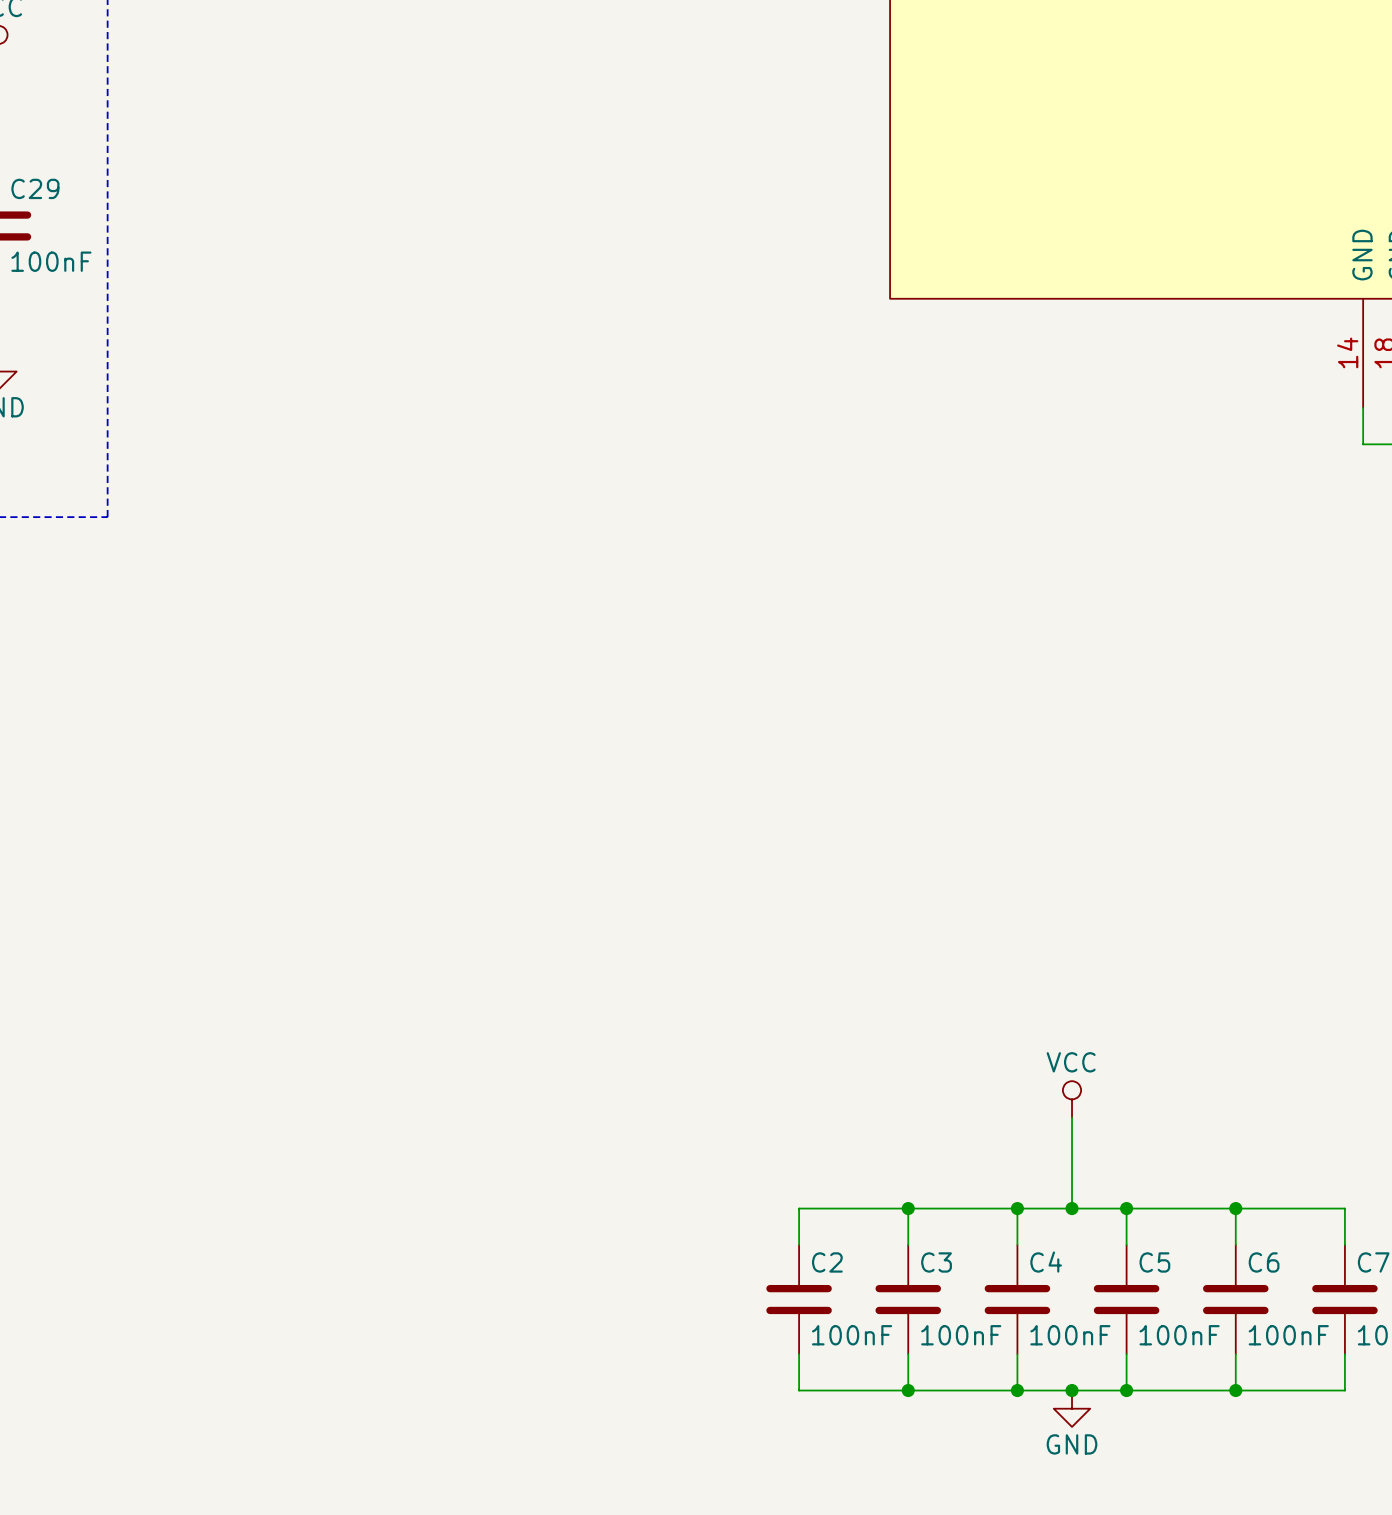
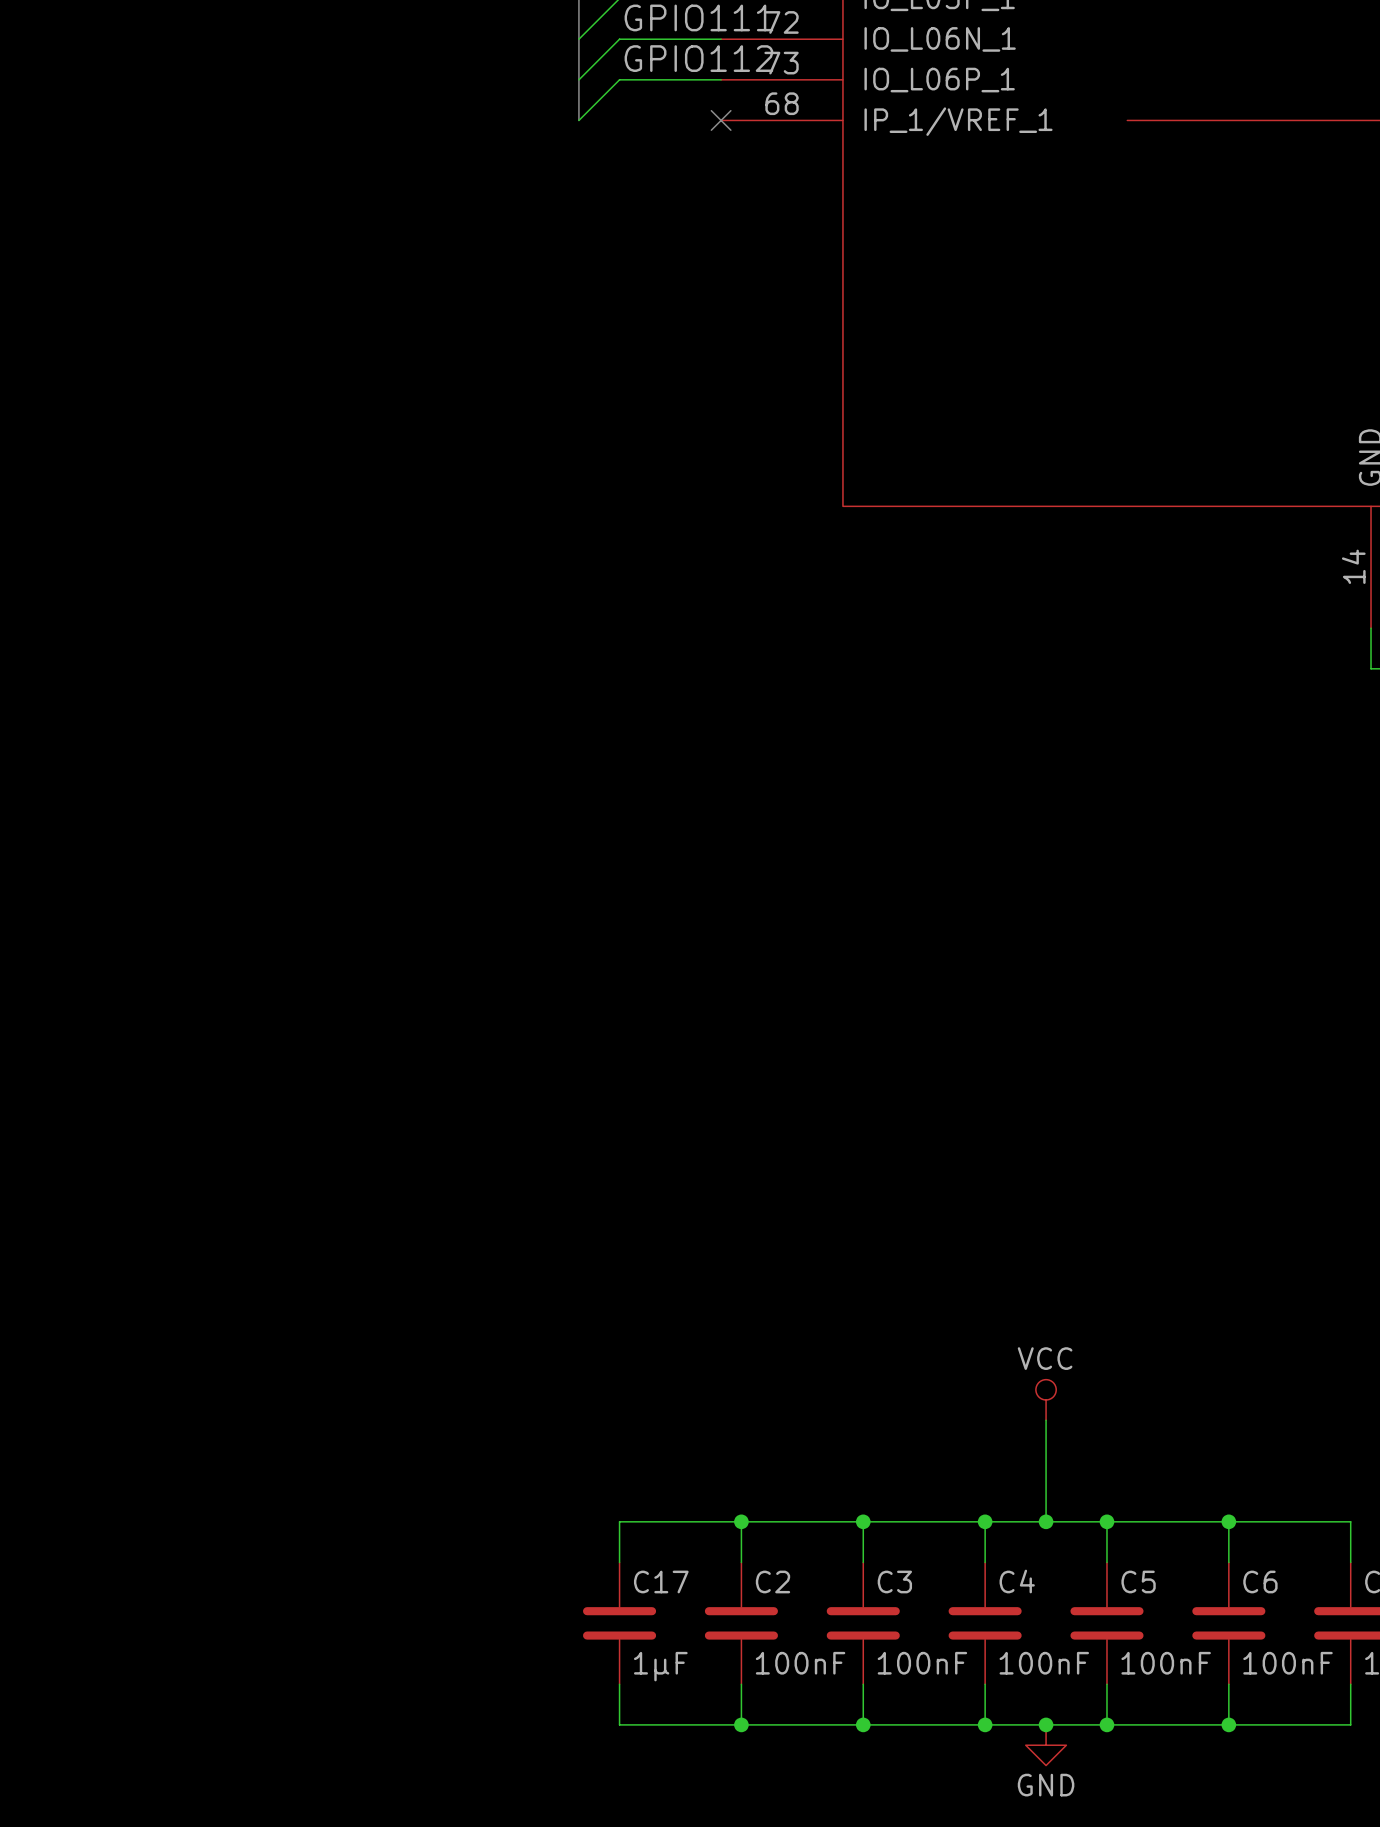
wire: none -> (741, 1521) (619, 1521) (619, 1562)
junction: none -> (741, 1521)
C17: none -> 1µF (619, 1623)
wire: none -> (619, 1684) (619, 1724) (741, 1724)
junction: none -> (741, 1724)

